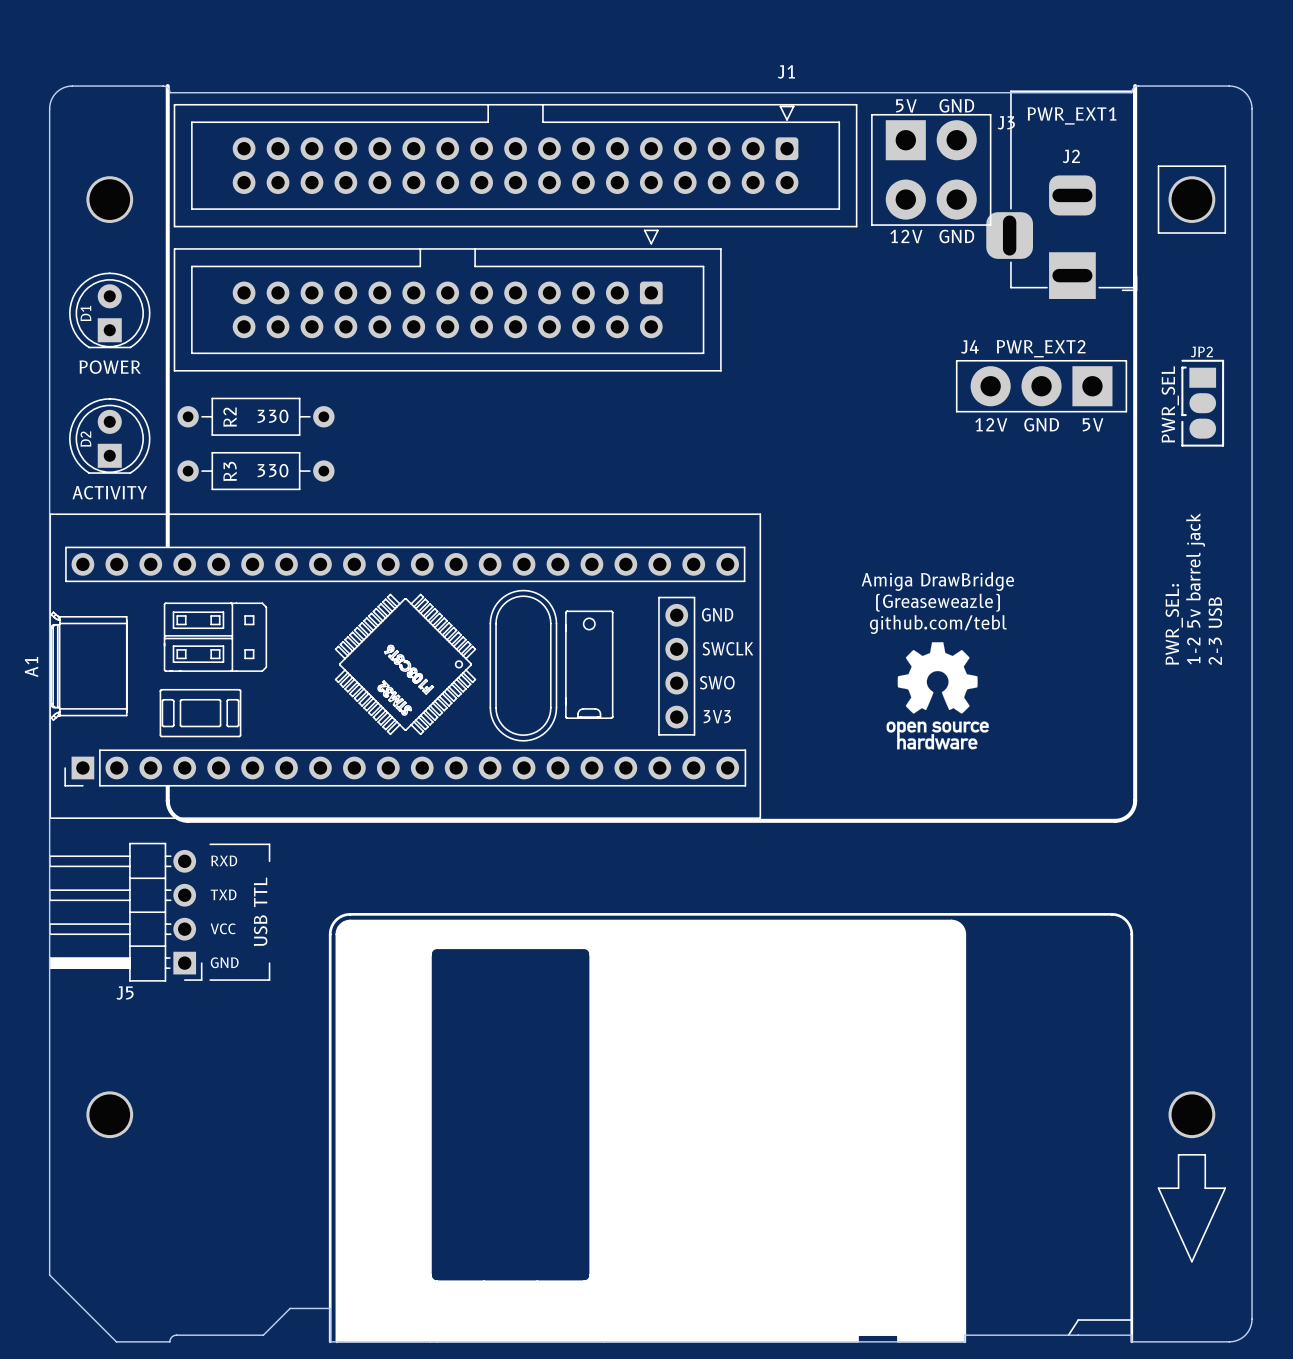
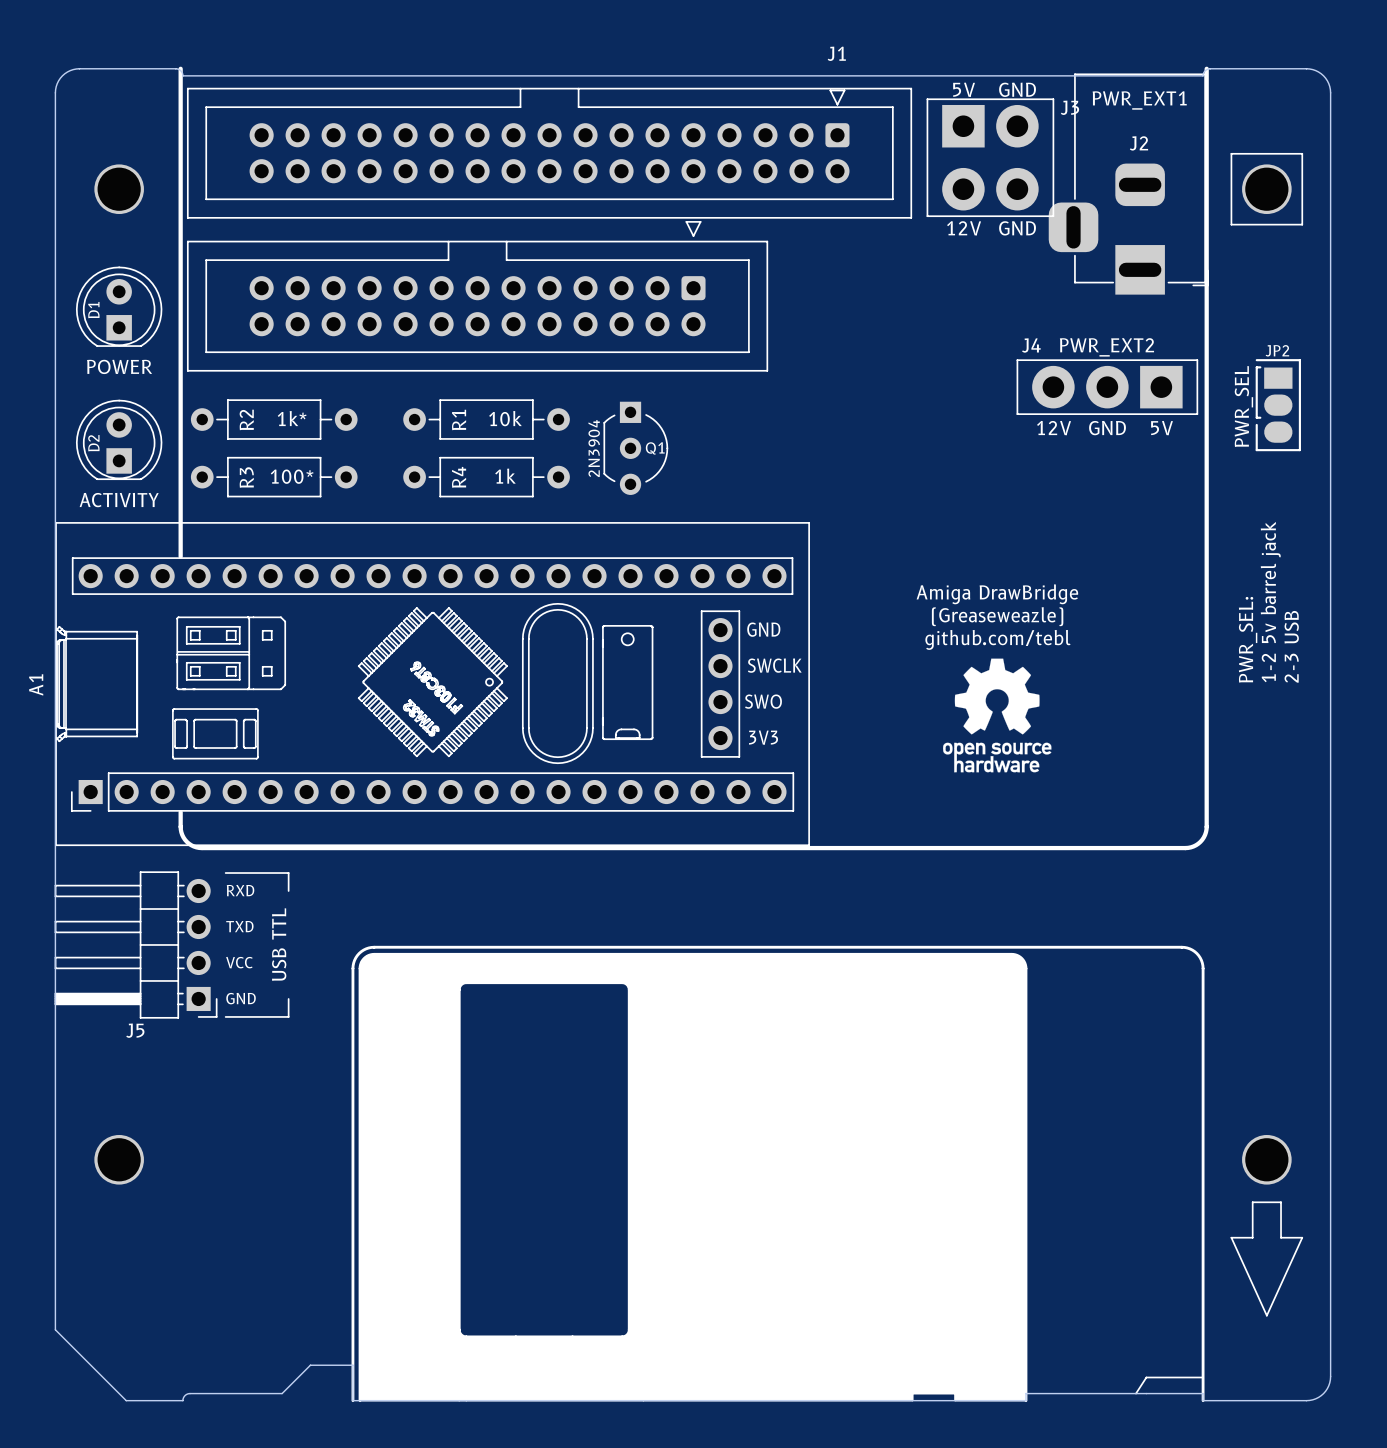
R2 value: 330 (272, 416) -> 1k* (292, 418)
R1: none -> 10k (486, 419)
Q1: none -> 2N3904 (635, 448)
R3 value: 330 (272, 470) -> 100* (292, 476)
R4: none -> 1k (486, 477)

